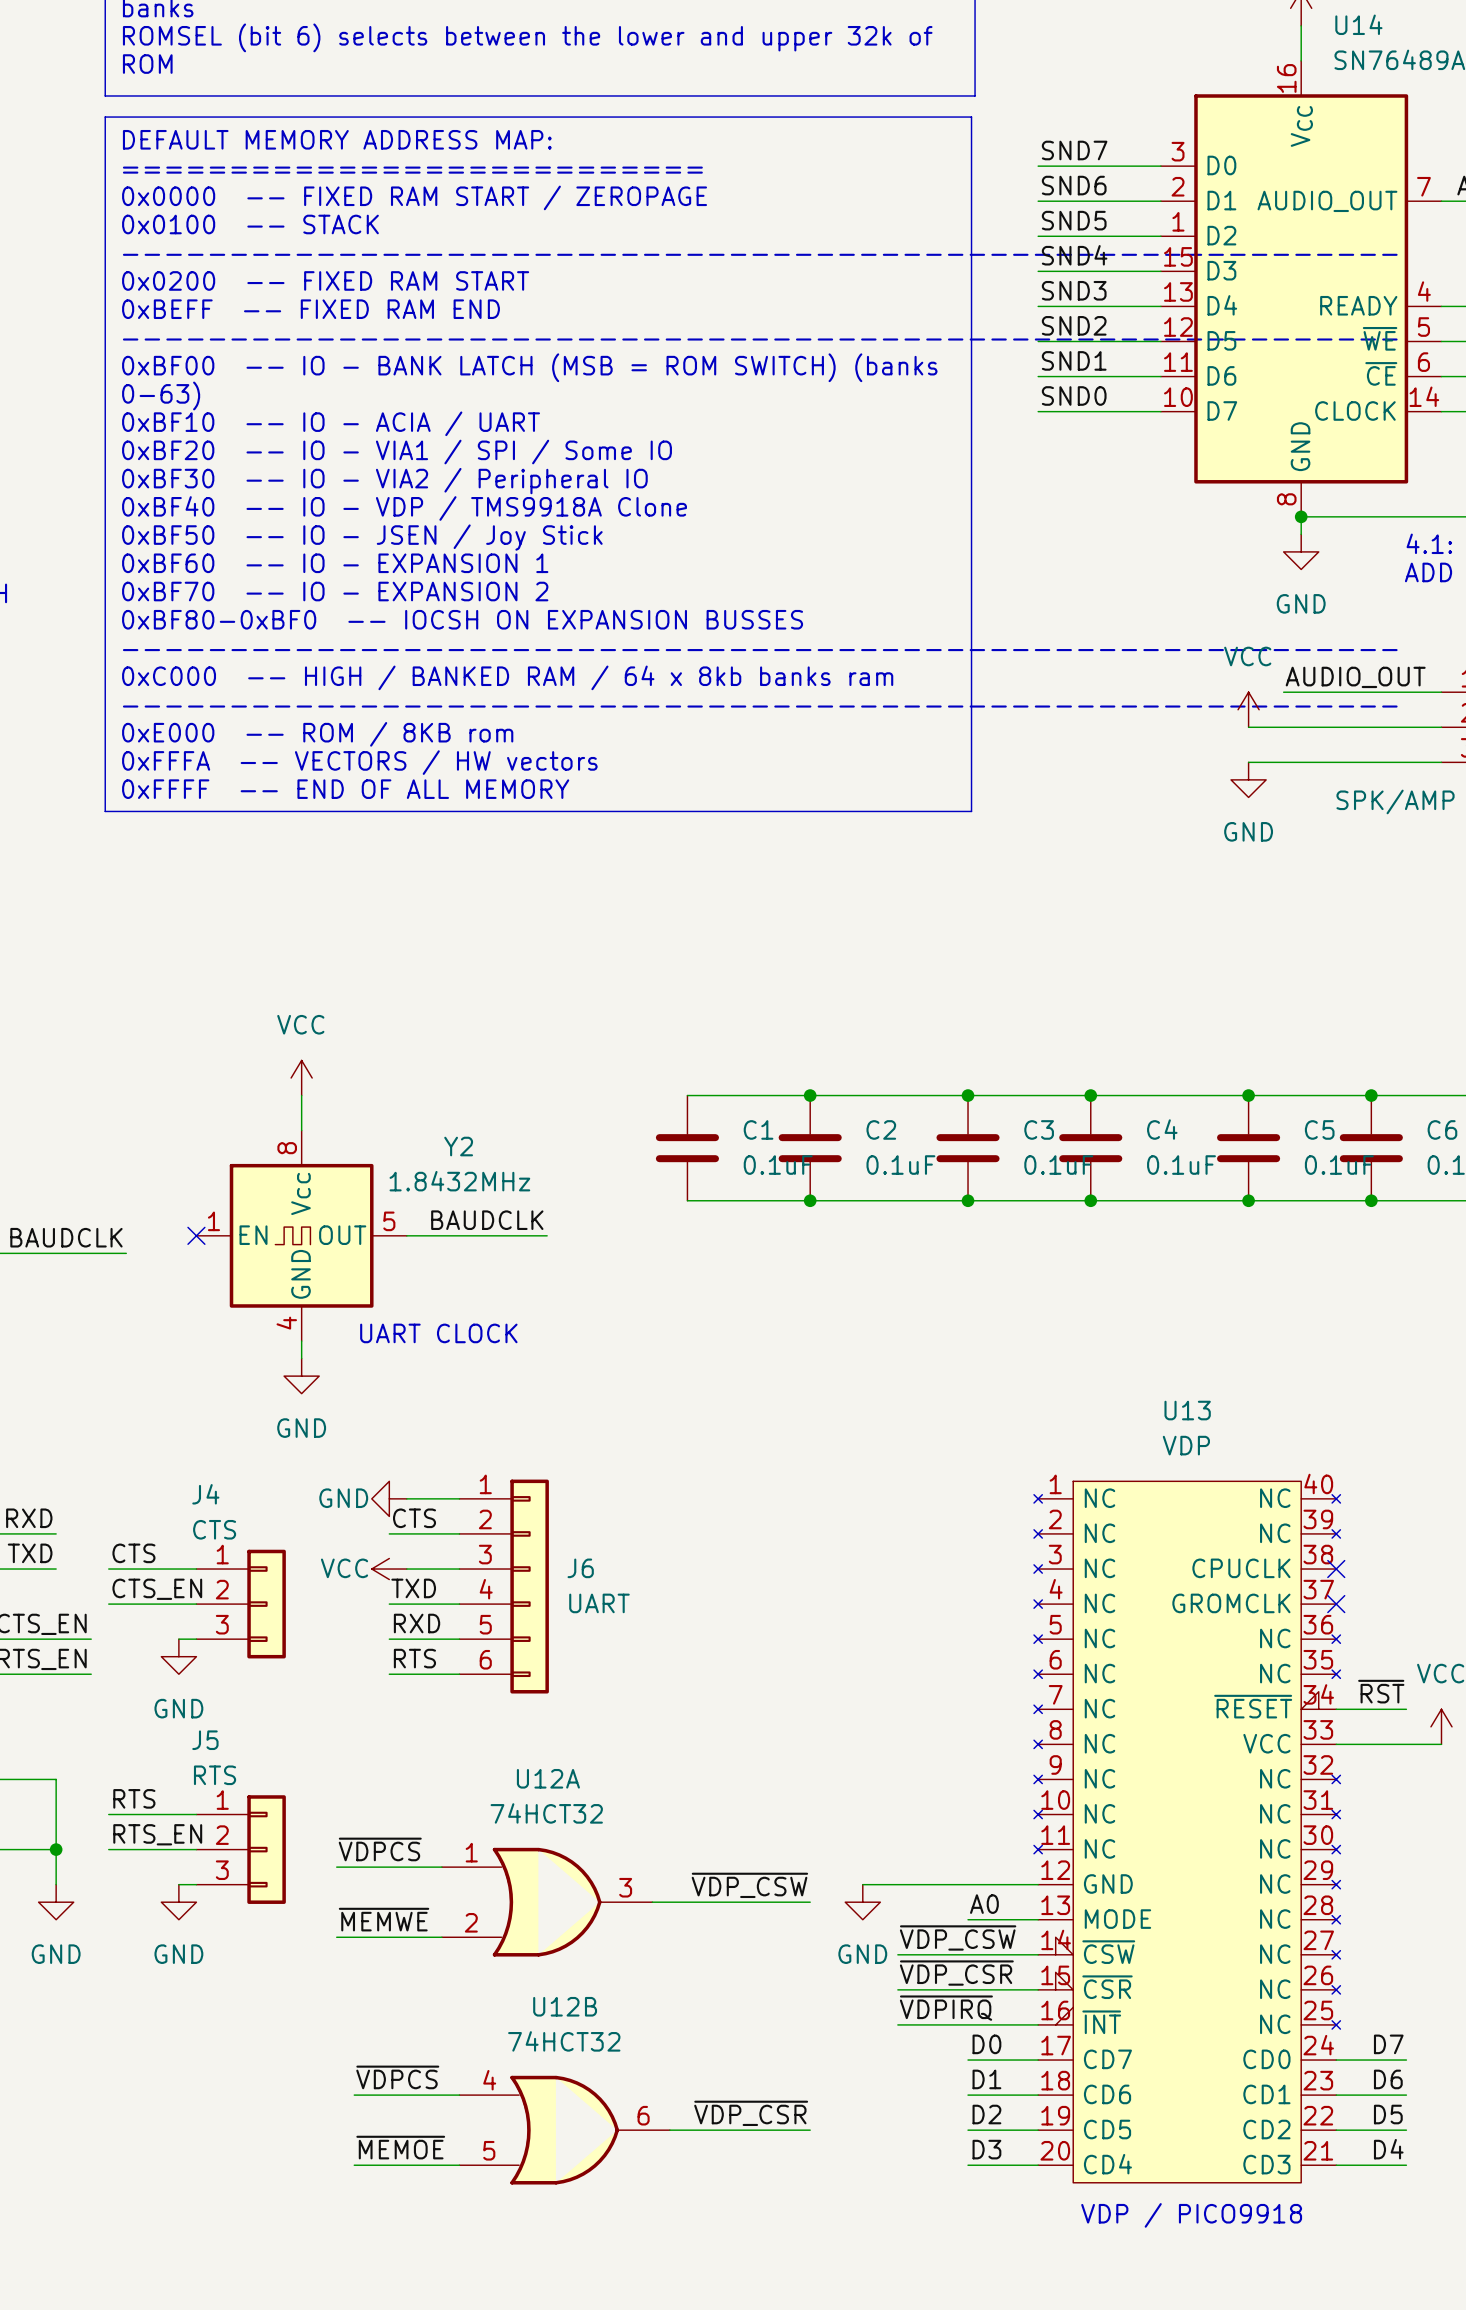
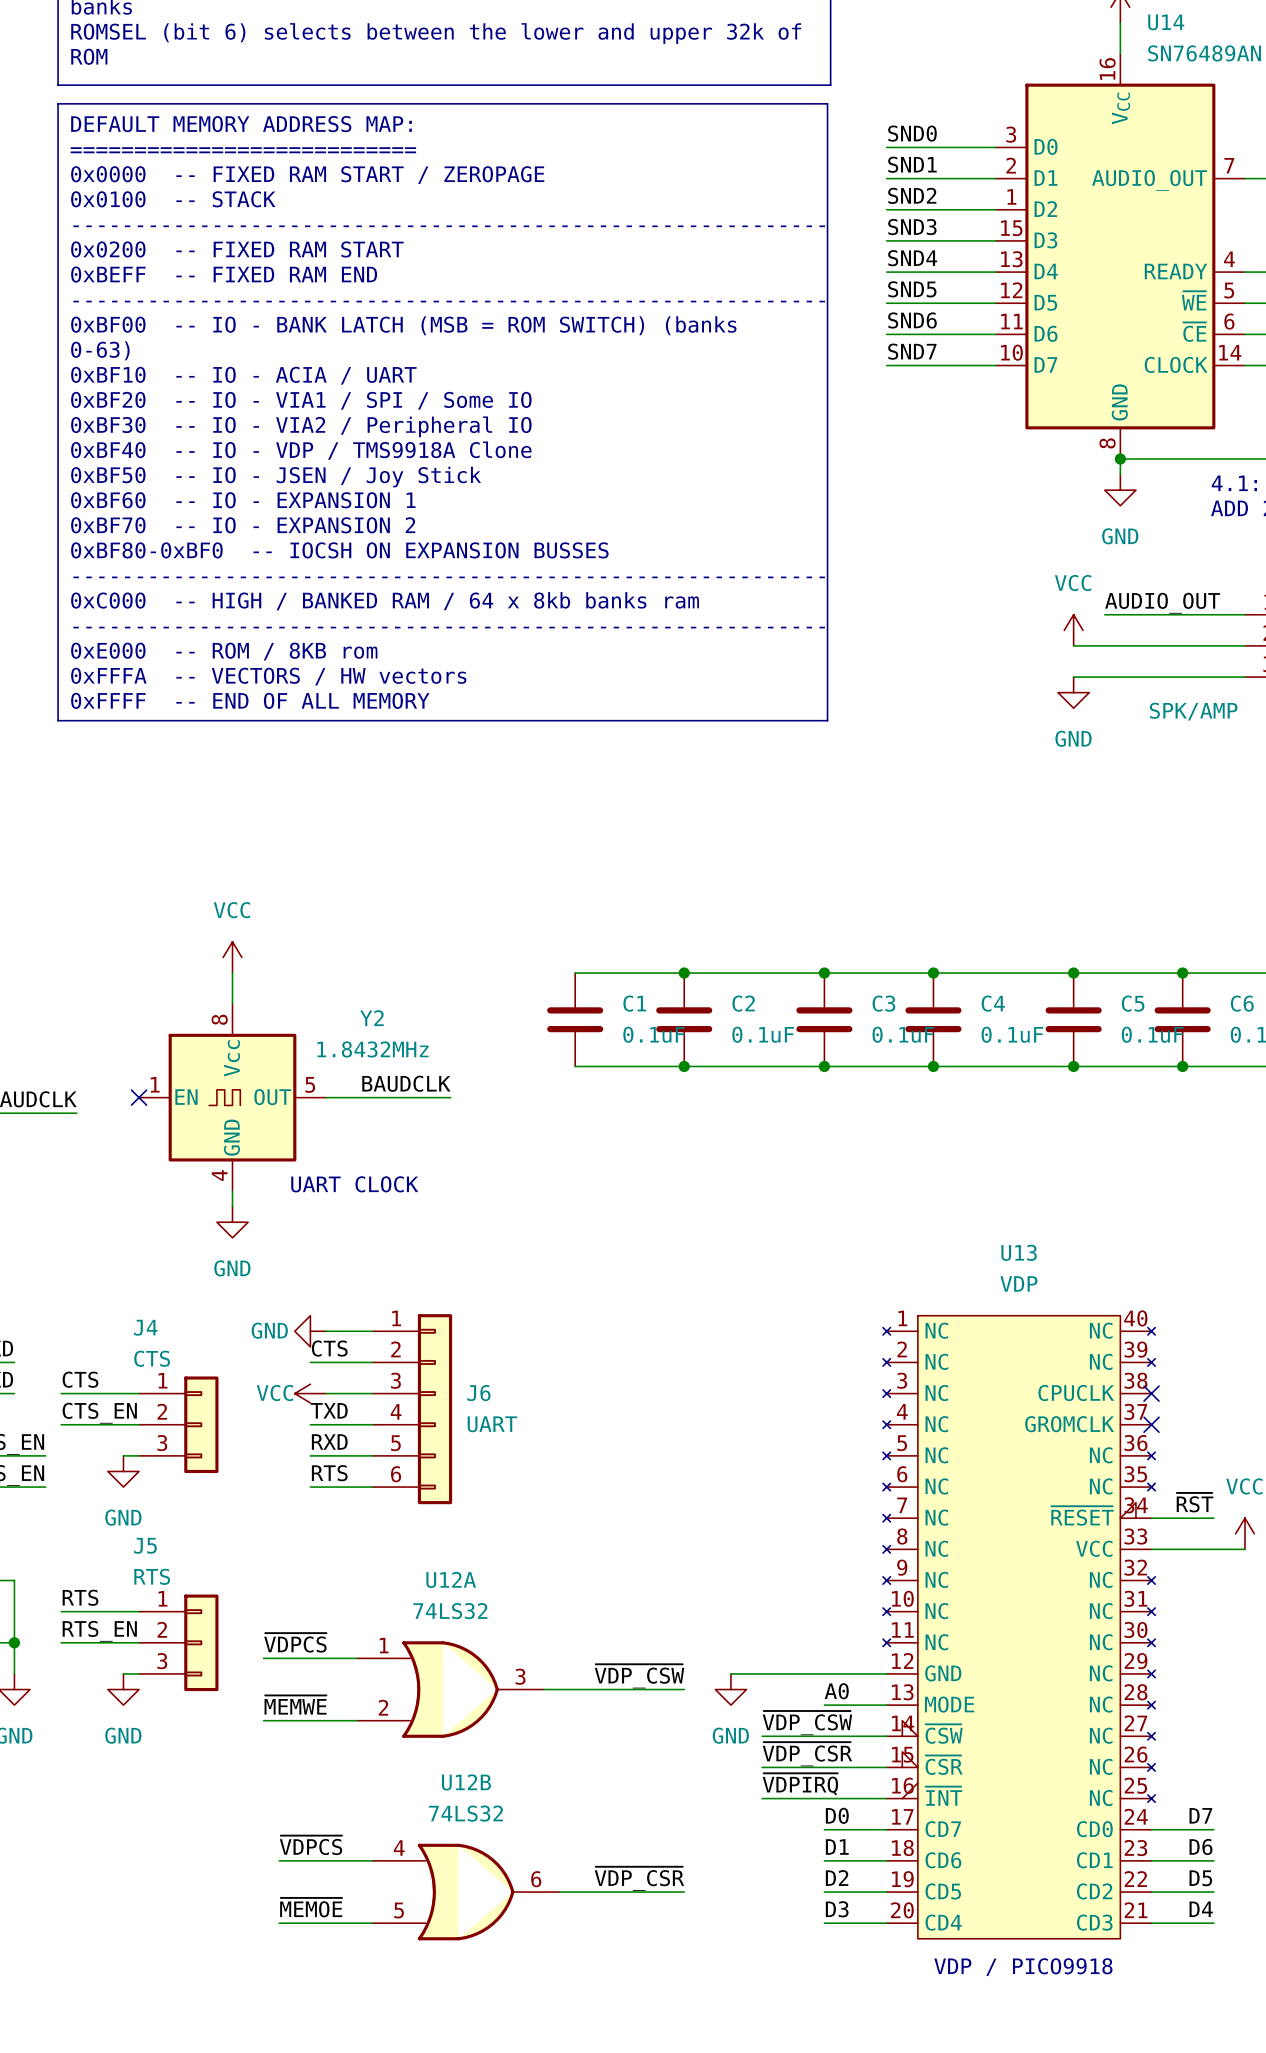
label: SND7 (1074, 150) -> SND0 (912, 133)
label: SND6 (1074, 185) -> SND1 (912, 164)
label: SND5 (1074, 220) -> SND2 (912, 195)
label: SND4 (1074, 255) -> SND3 (912, 227)
label: SND3 (1074, 290) -> SND4 (912, 258)
label: SND2 (1074, 325) -> SND5 (912, 289)
label: SND1 (1074, 360) -> SND6 (912, 320)
label: SND0 (1074, 395) -> SND7 (912, 351)
U12A value: 74HCT32 (546, 1813) -> 74LS32 (450, 1611)
U12B value: 74HCT32 (564, 2041) -> 74LS32 (465, 1813)

